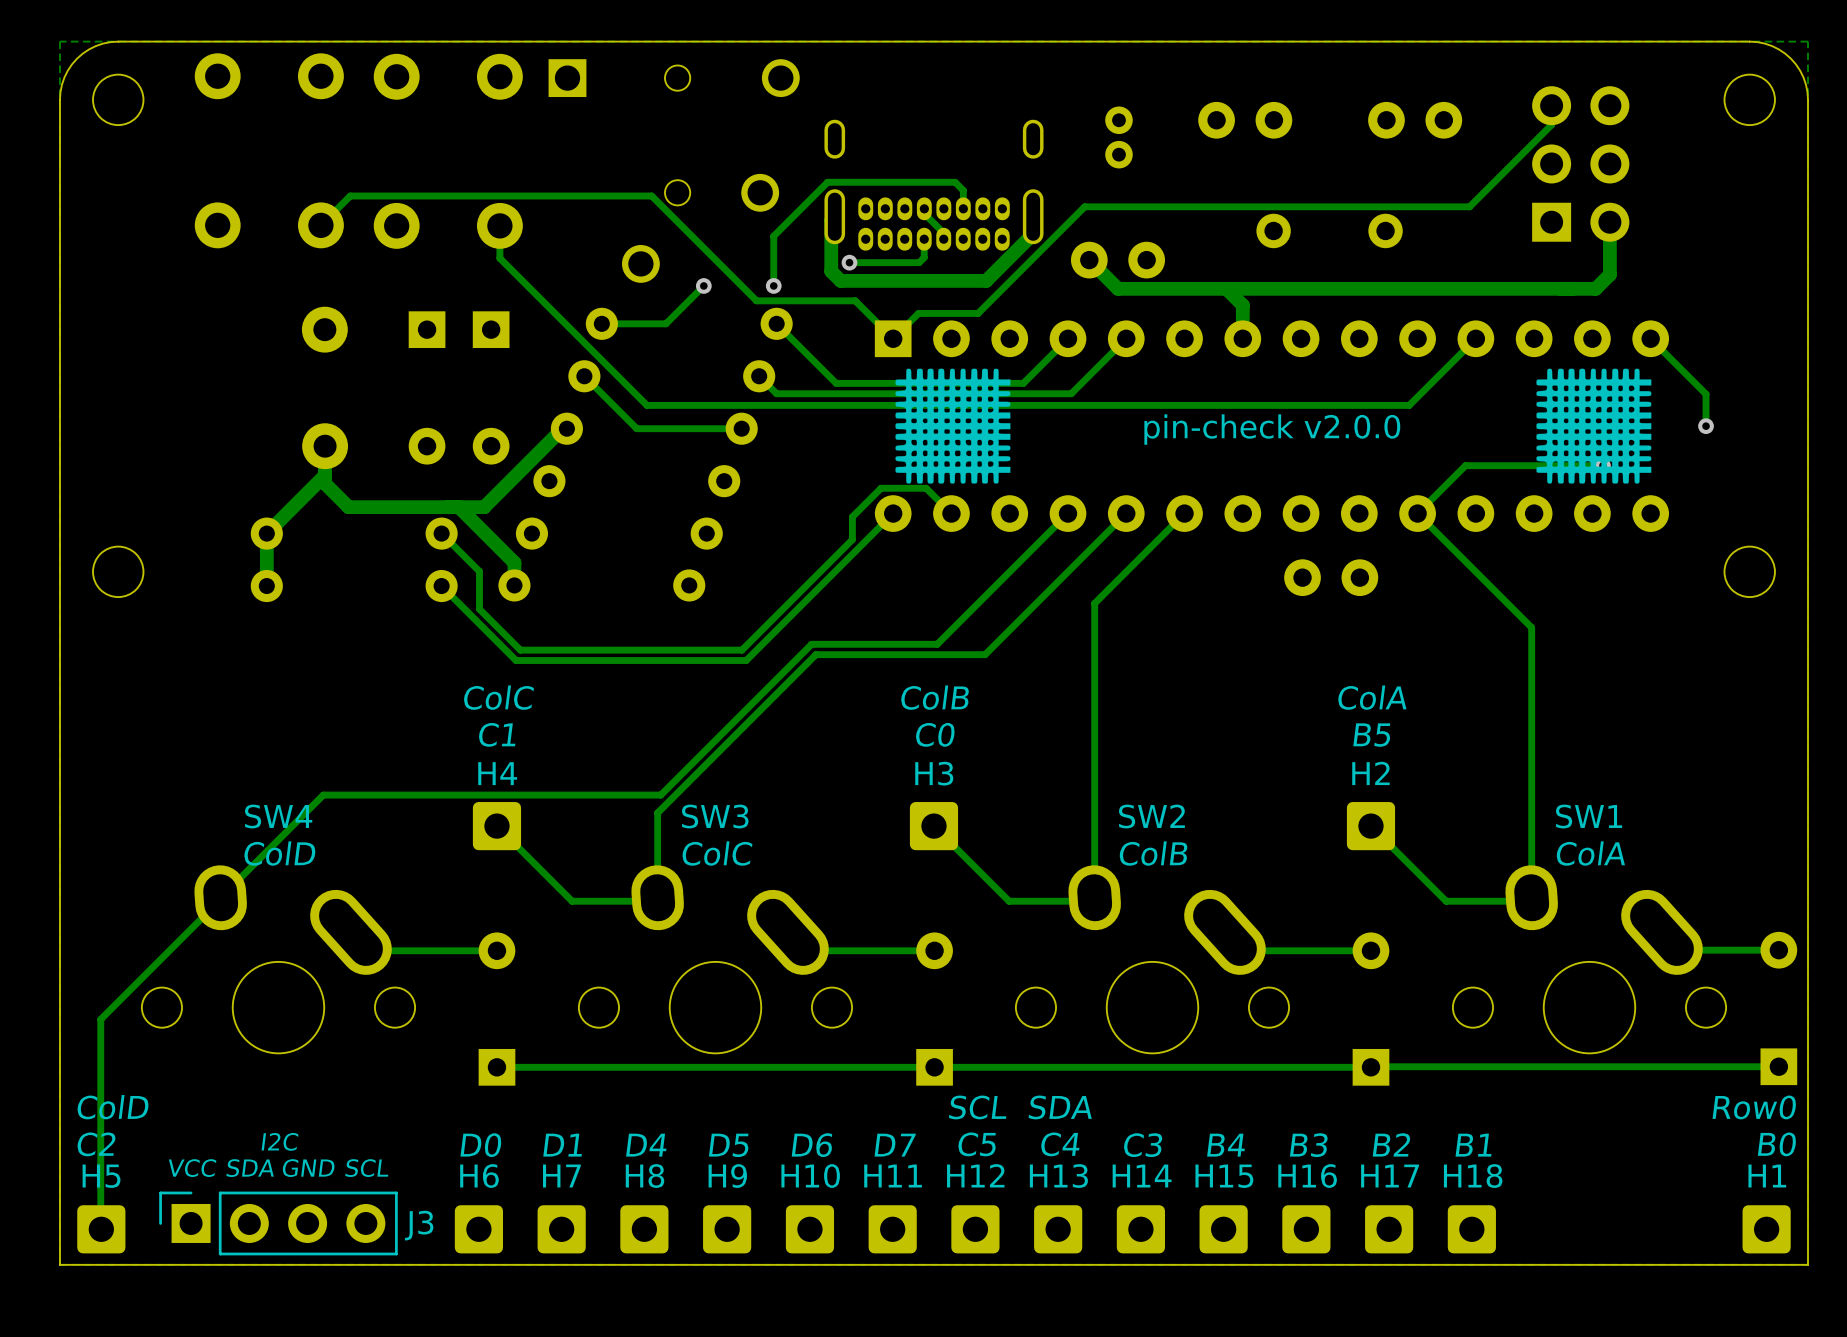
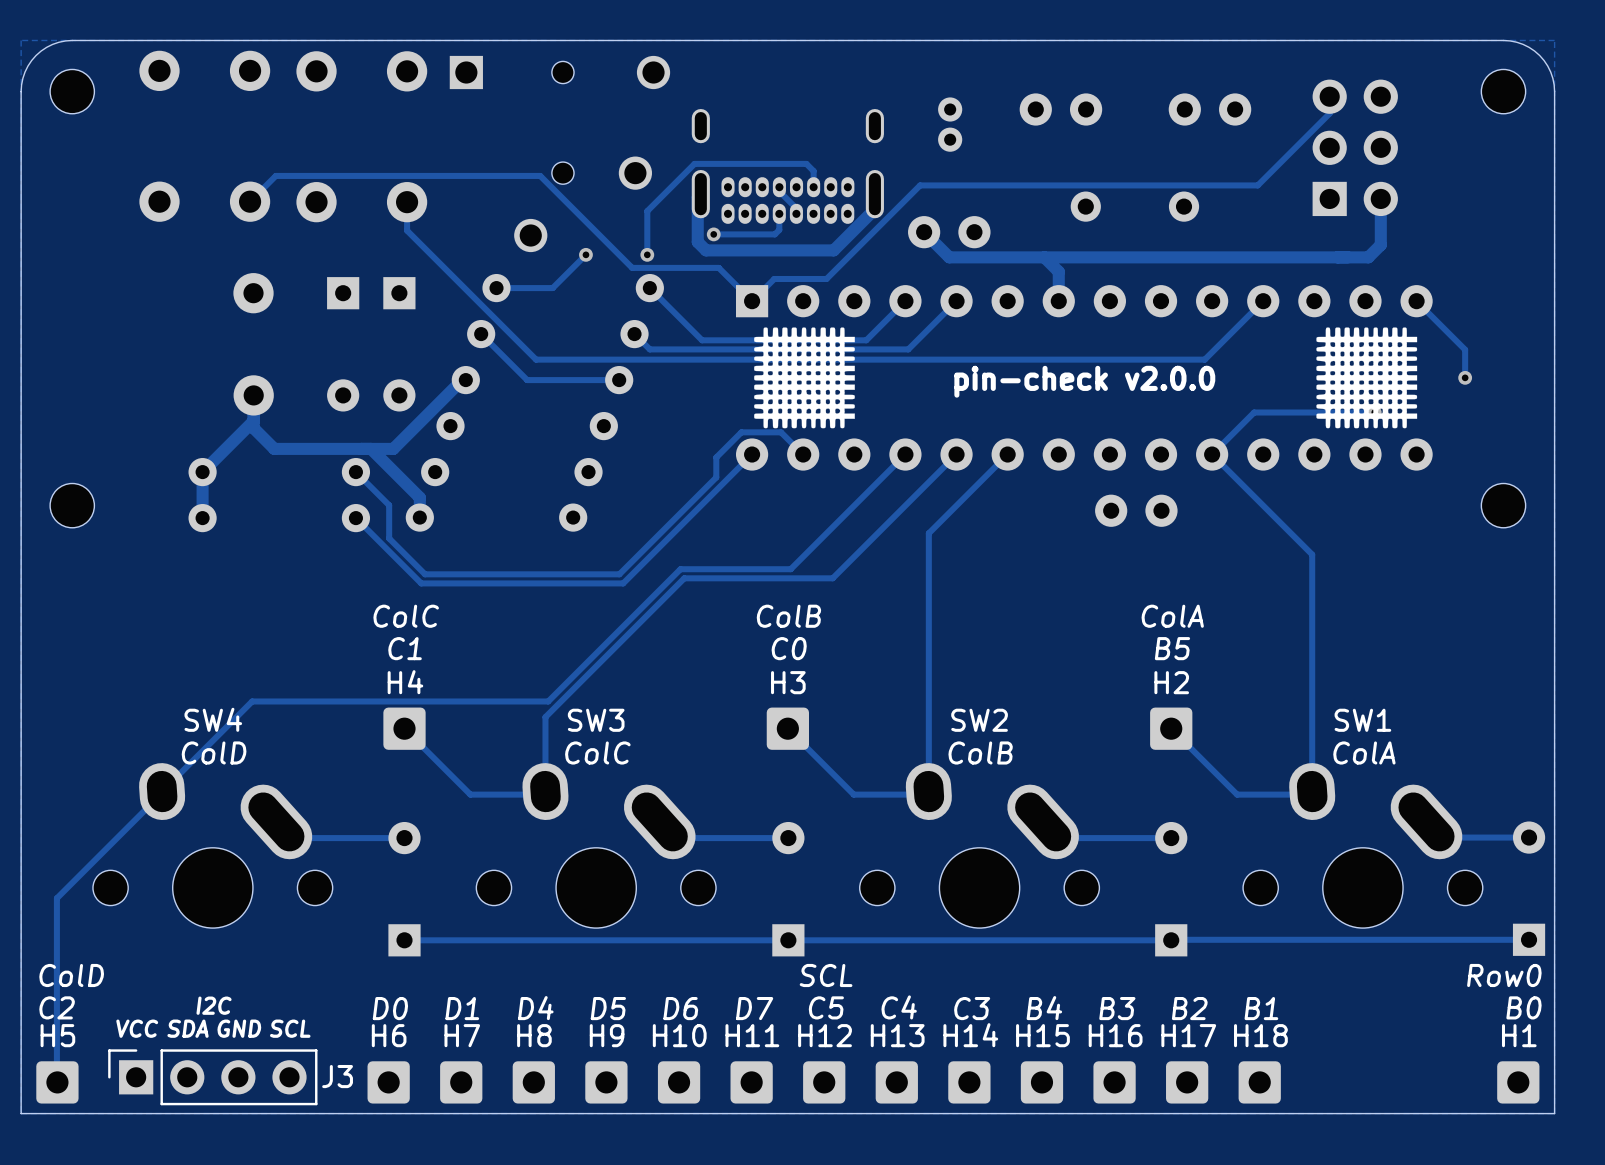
text: SDA (1060, 1107) -> none

